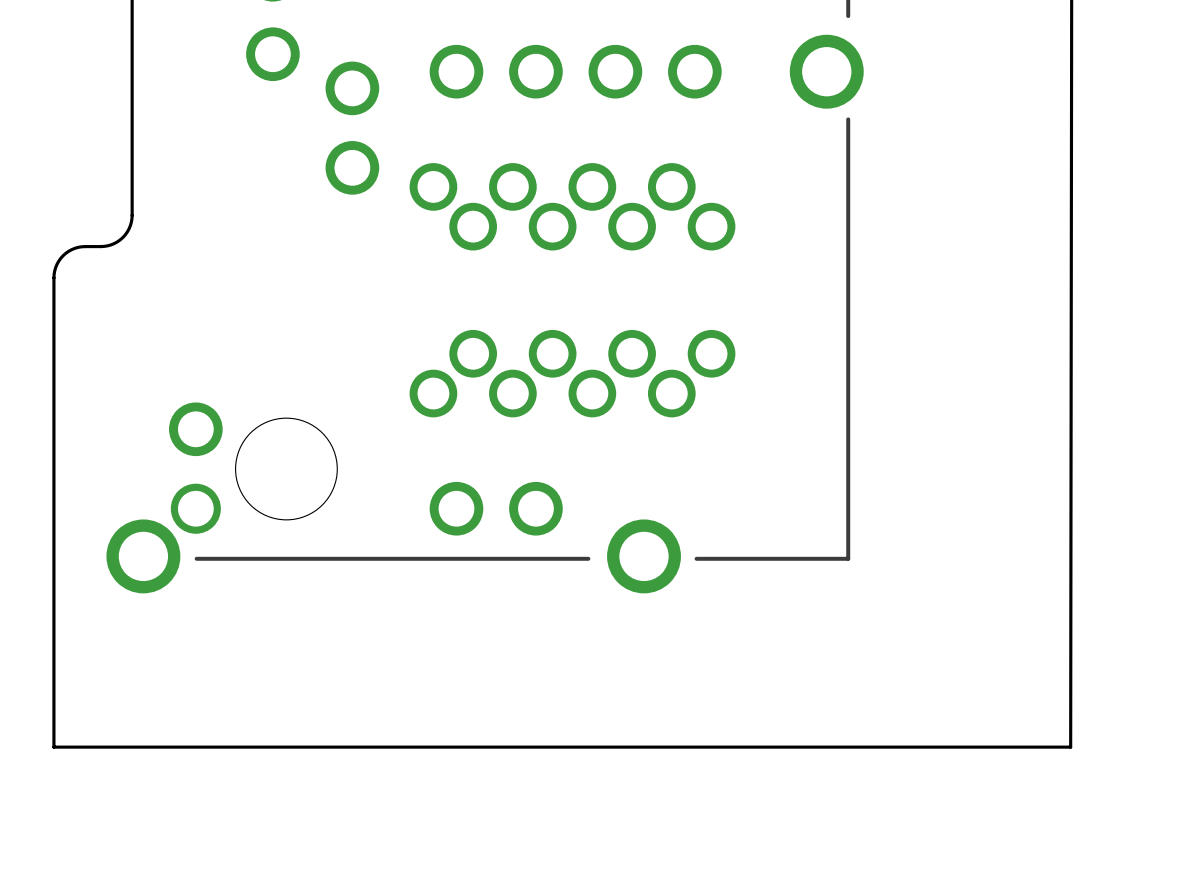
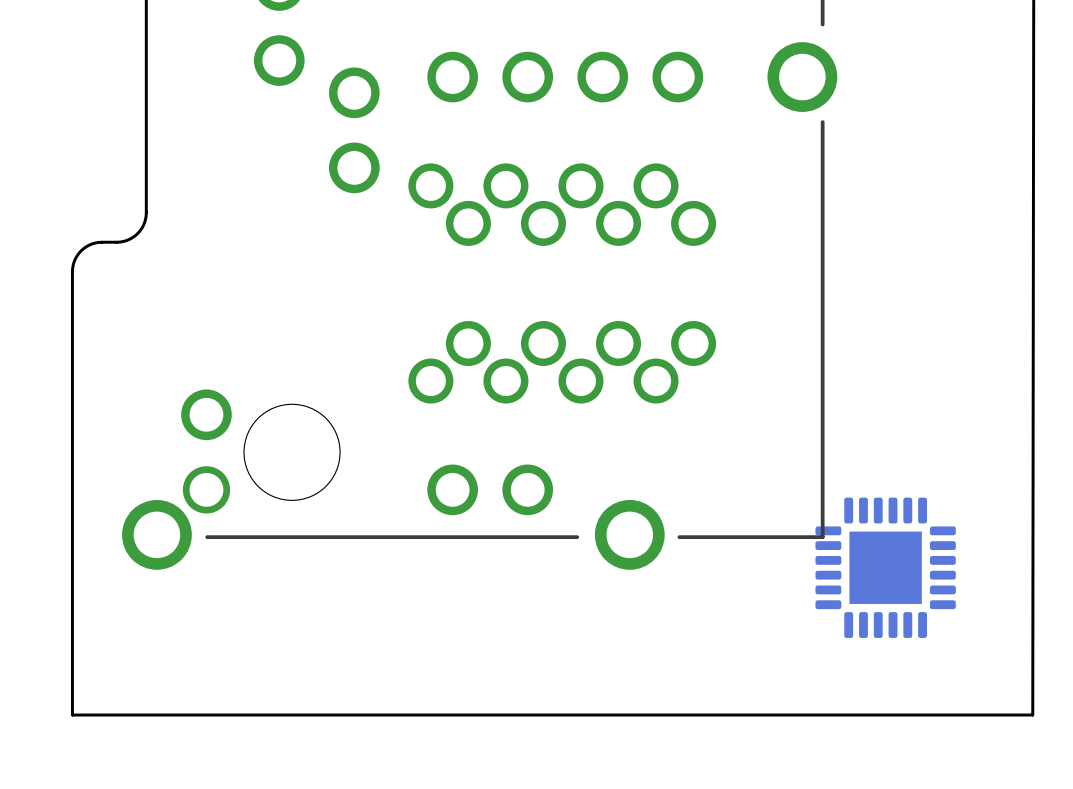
part: none -> (885, 567)

